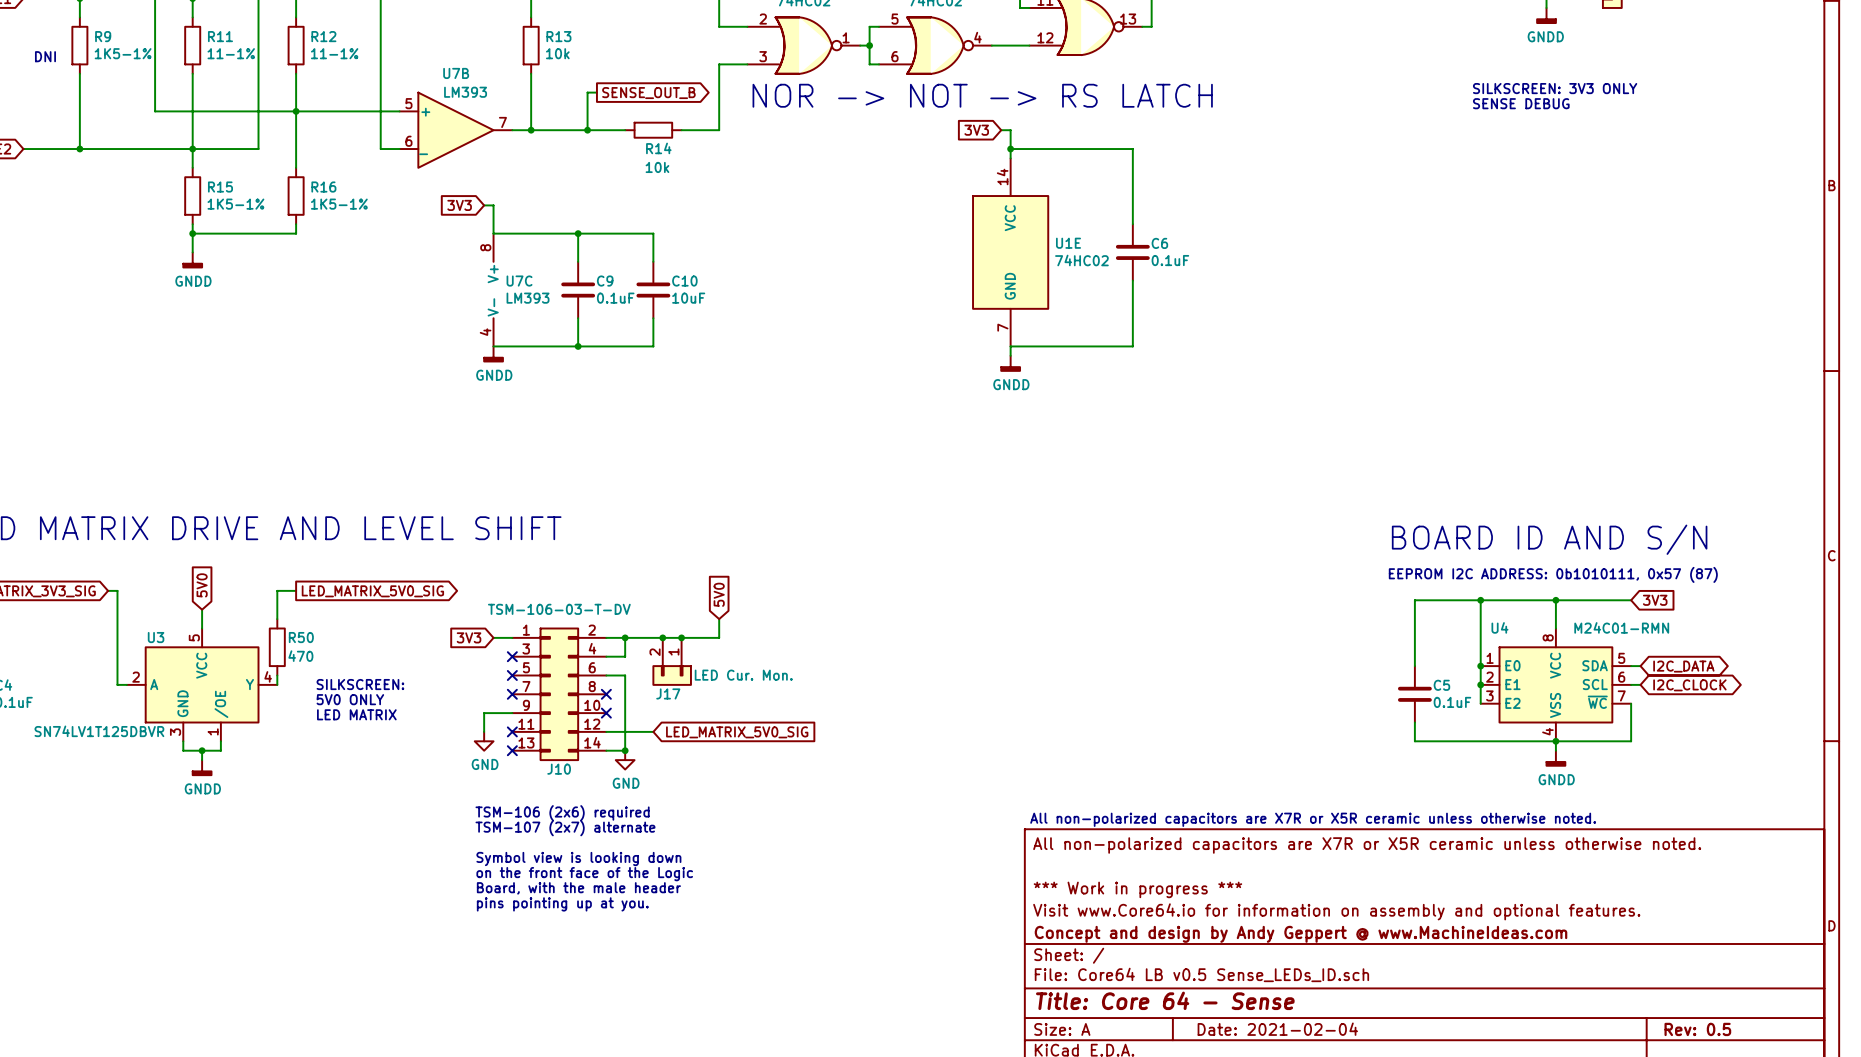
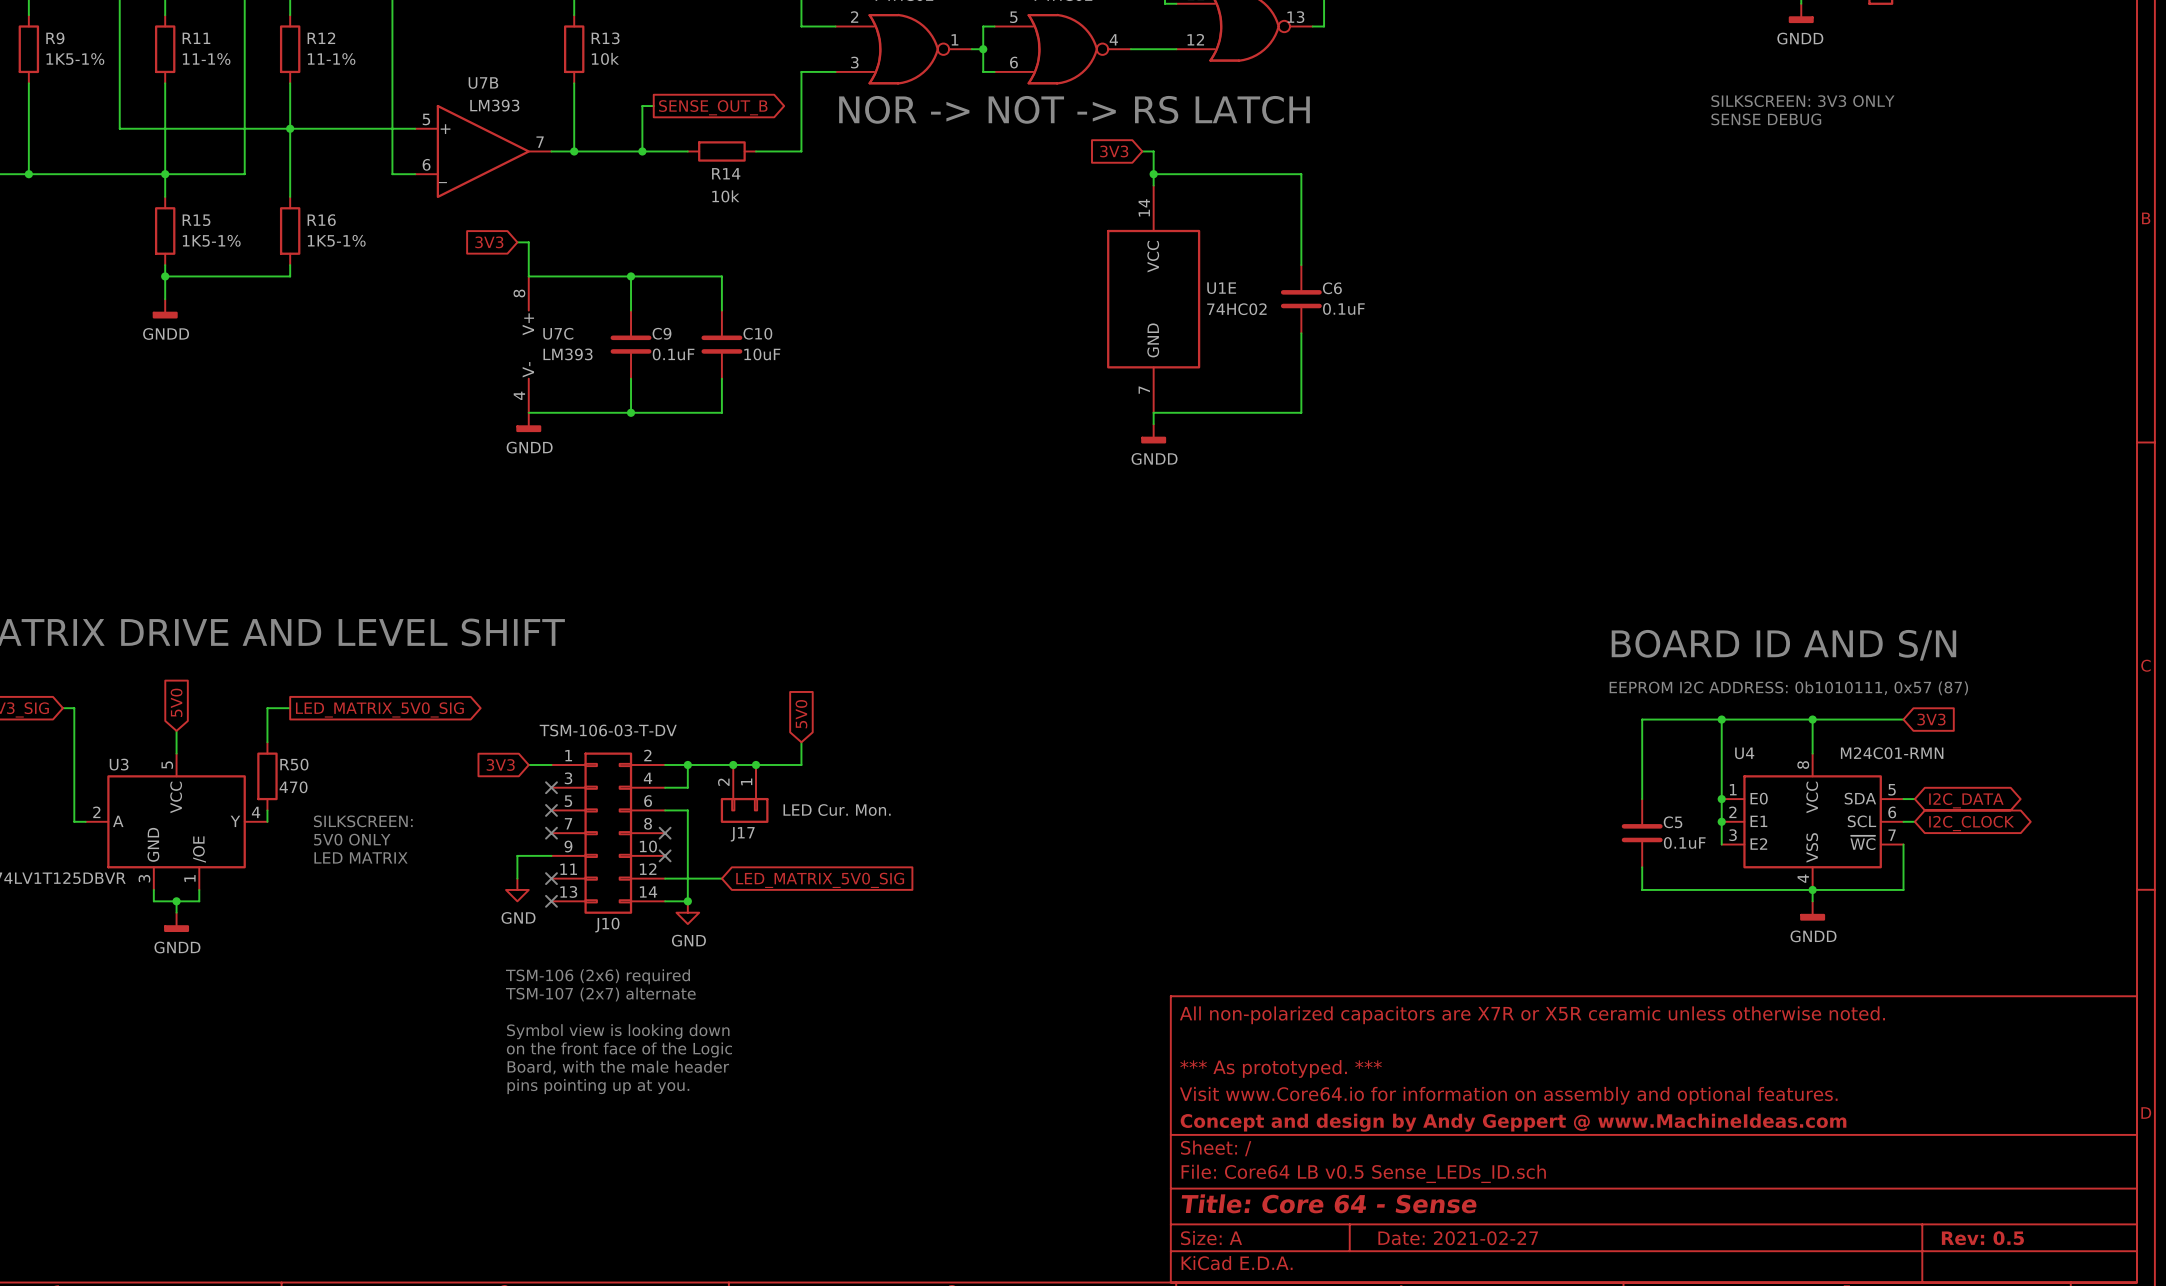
text: All non-polarized capacitors are X7R or X5R ceramic unless otherwise noted. (1313, 819) -> none
title block: *** Work in progress *** (1137, 889) -> *** As prototyped. *** (1281, 1068)
title block: Date: 2021-02-04 (1277, 1029) -> Date: 2021-02-27 (1458, 1238)

